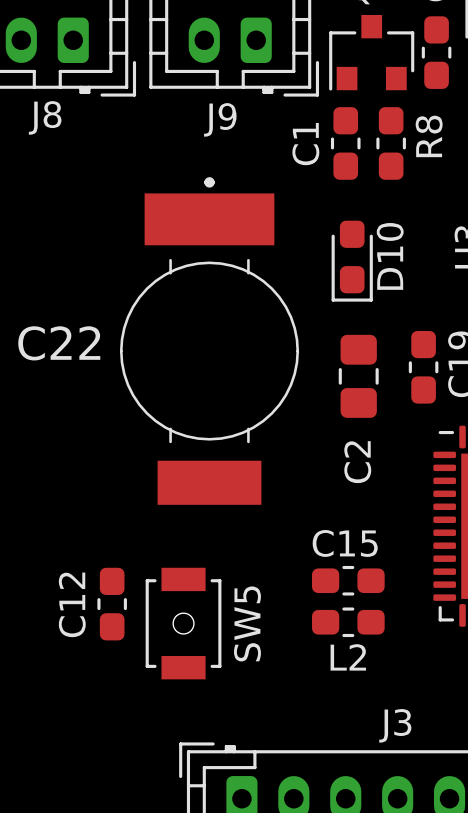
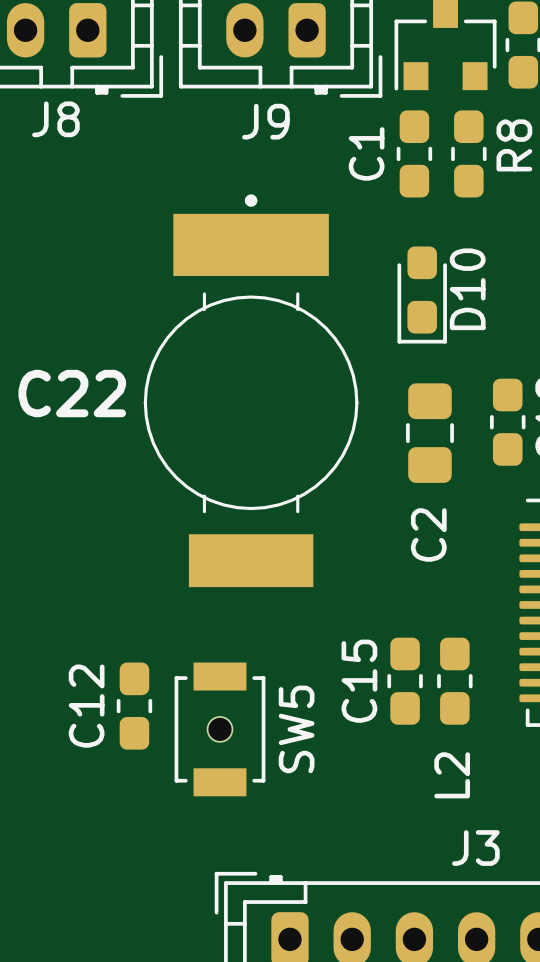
C15 rotation: 0° (348, 580) -> 90° clockwise (405, 681)
L2 rotation: 0° (348, 622) -> 90° clockwise (454, 681)
L2 position: (348, 622) -> (454, 681)

